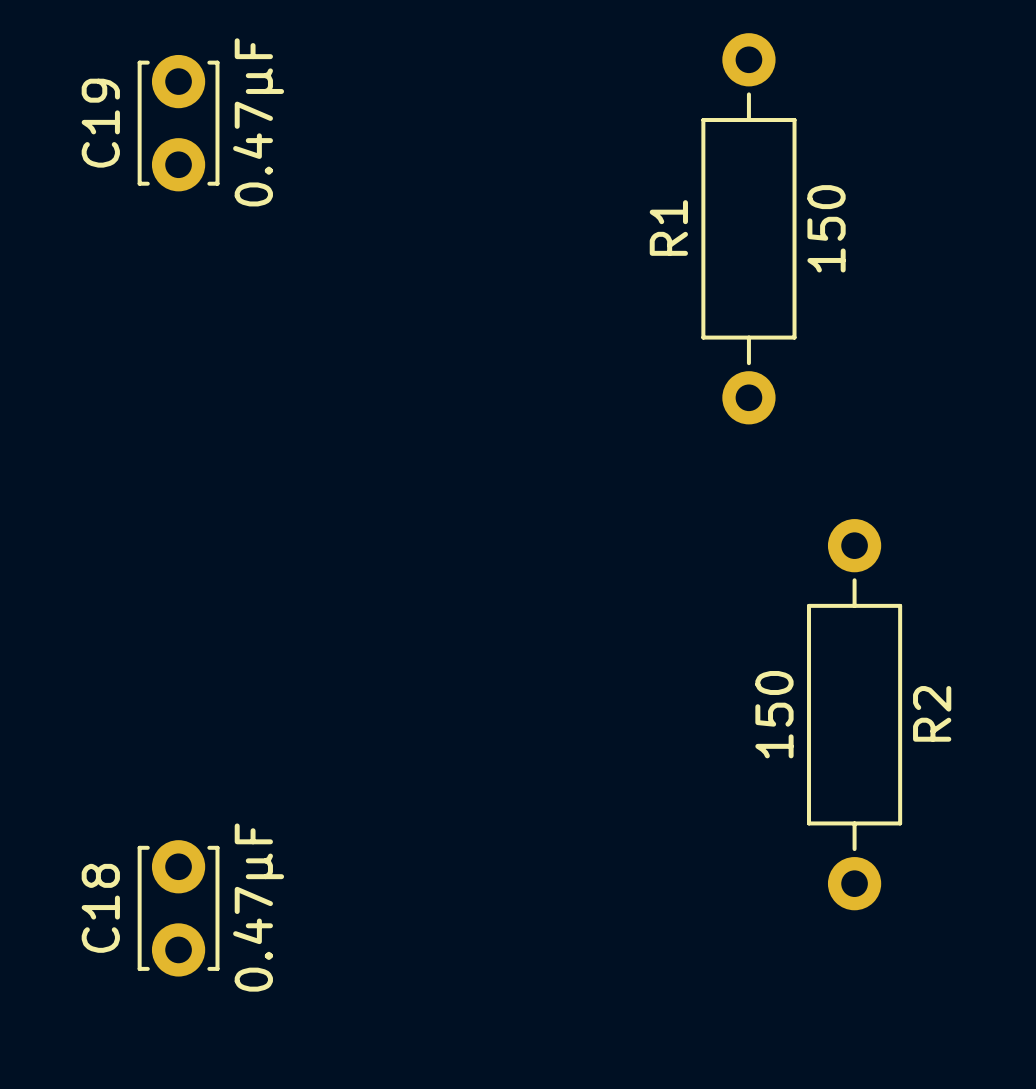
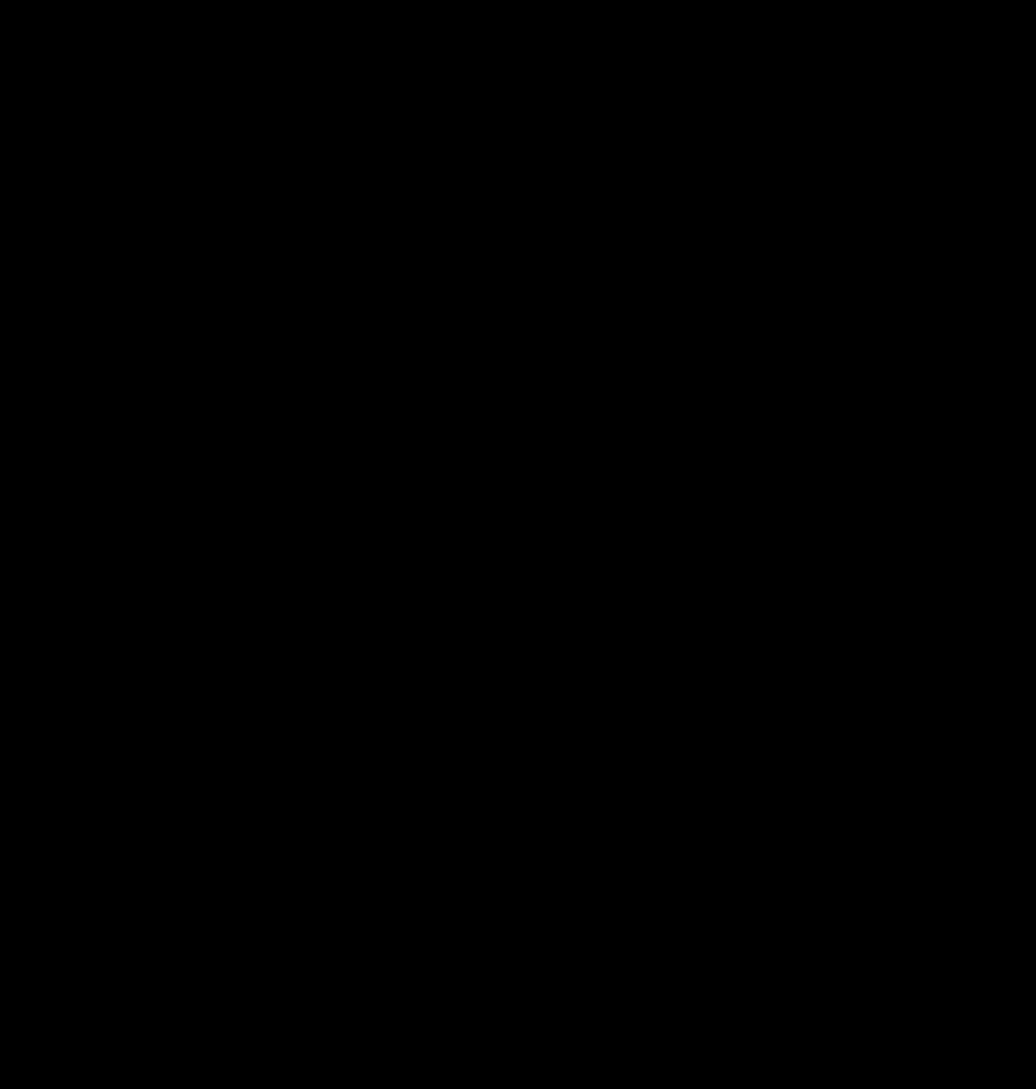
C19: 0.47µF (178, 123) -> none
R1: 150 (748, 228) -> none
R2: 150 (854, 714) -> none
C18: 0.47µF (178, 908) -> none

